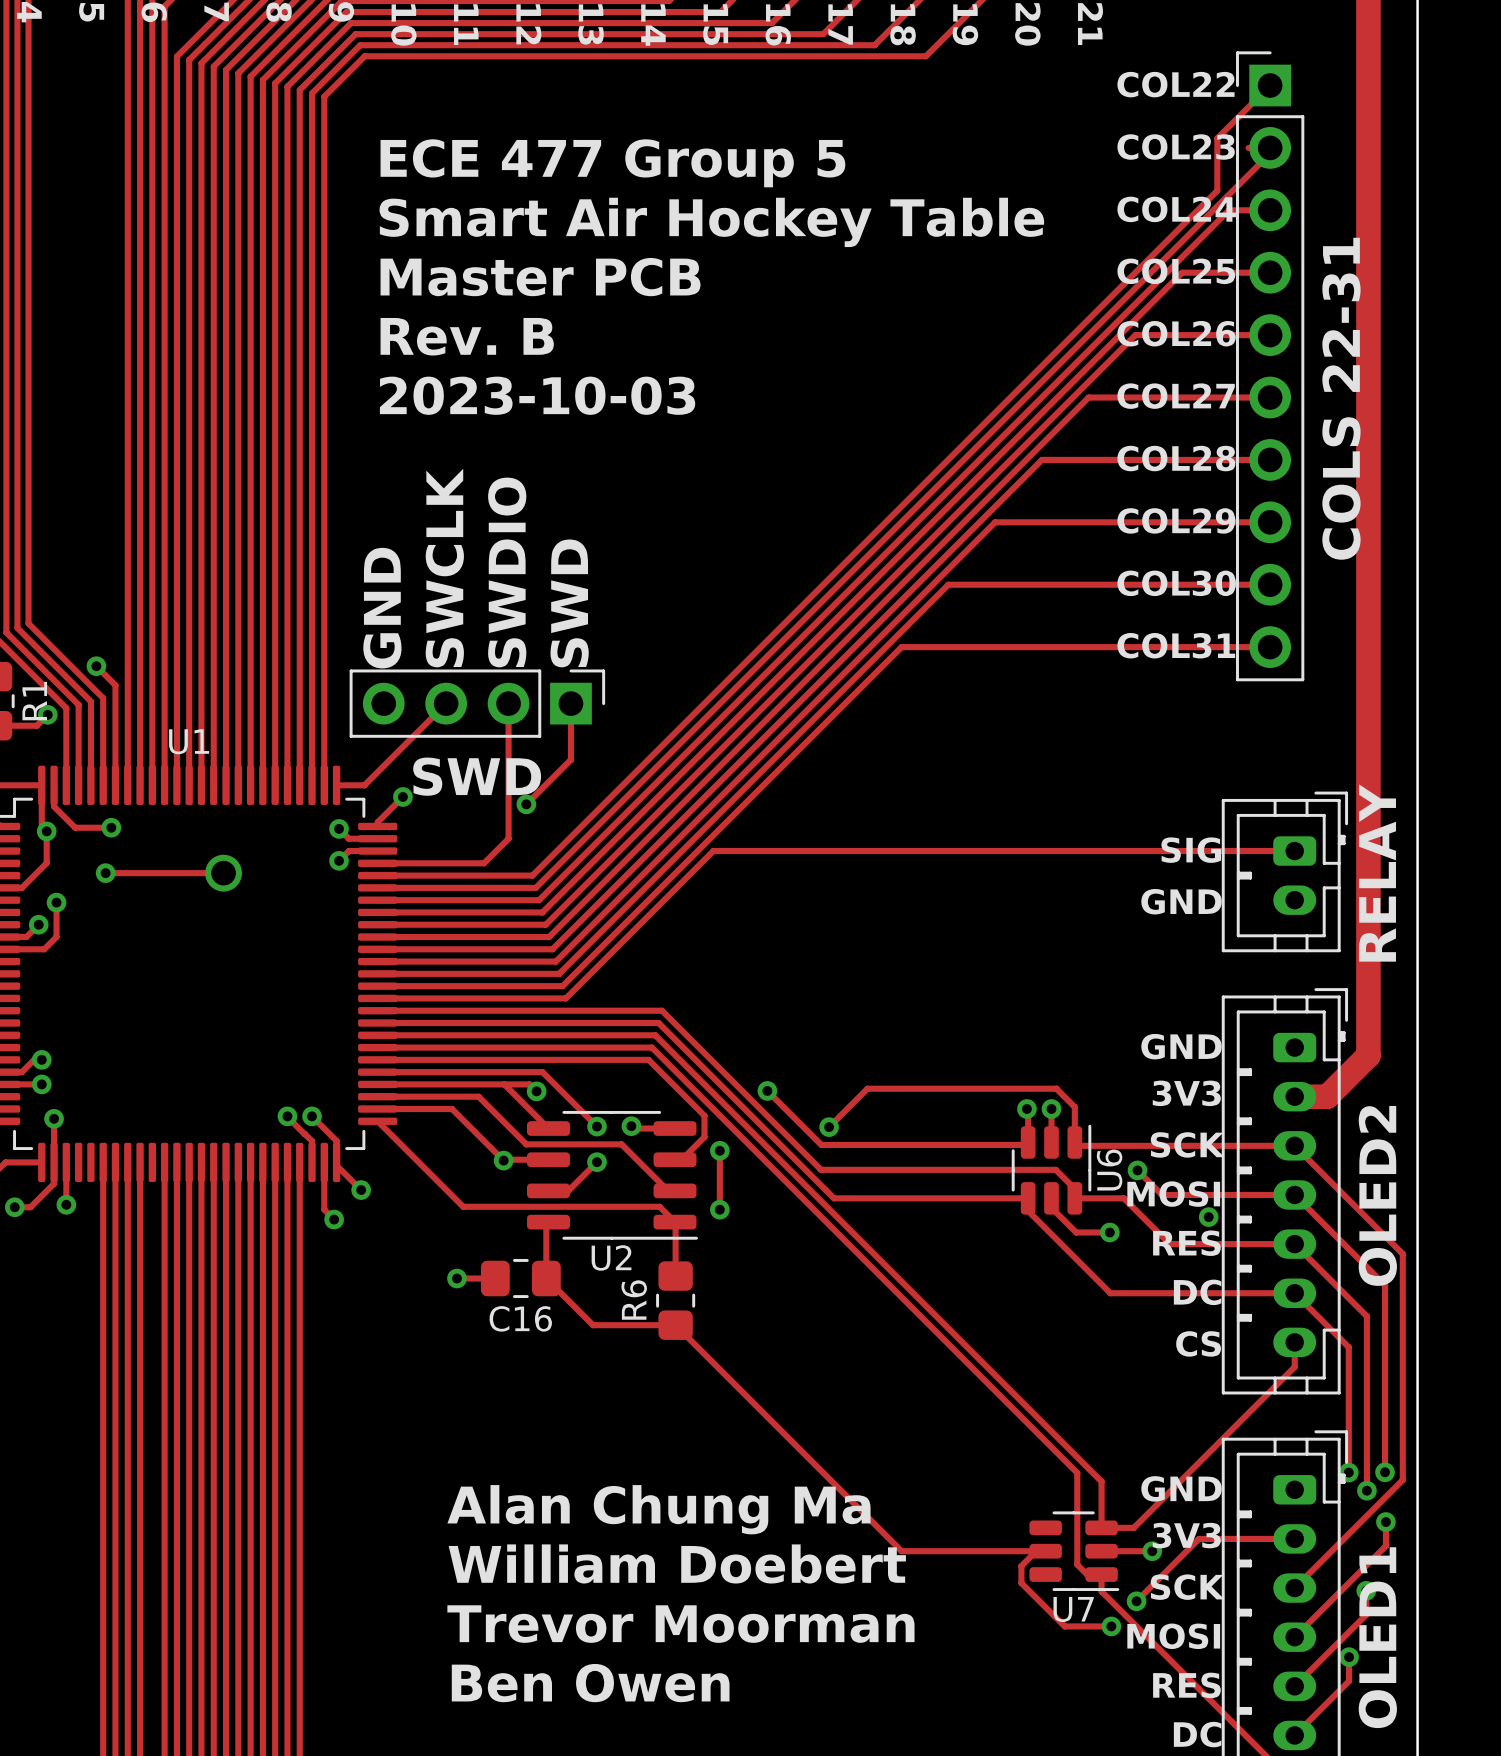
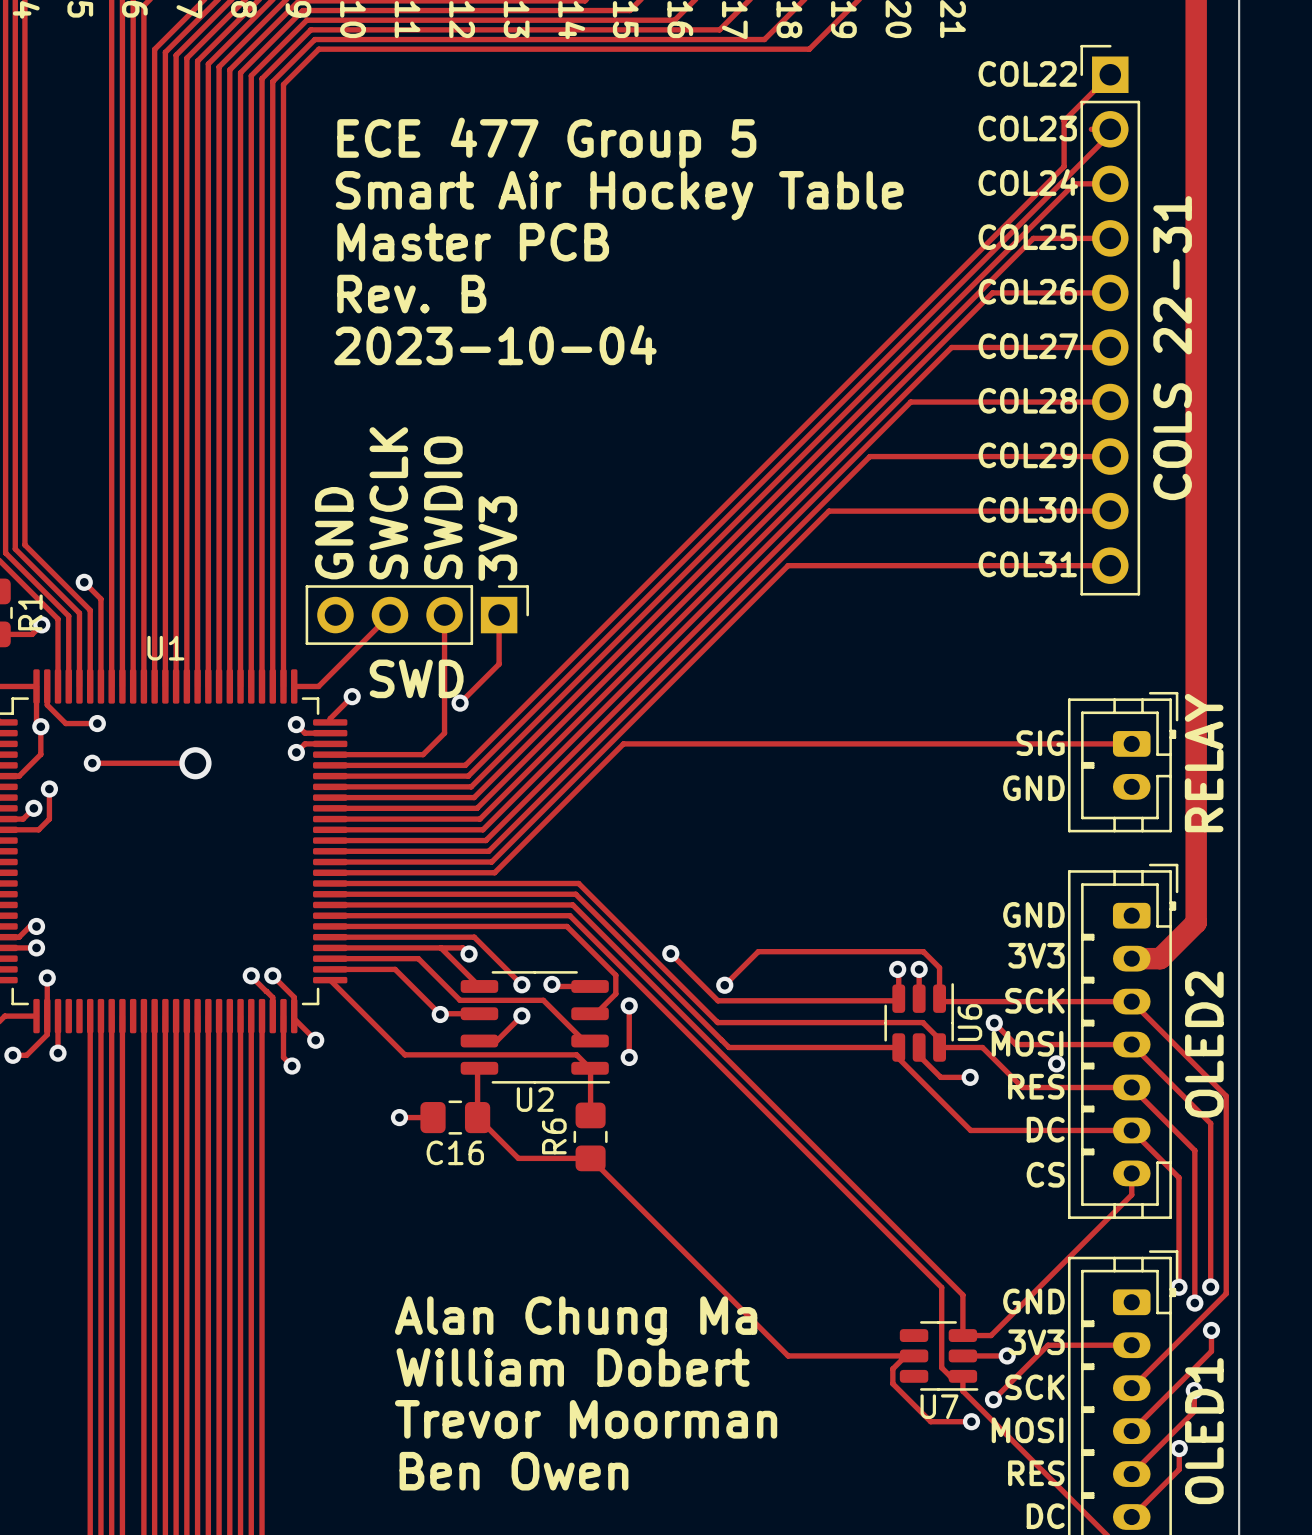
text: 2023-10-03 (537, 395) -> 2023-10-04 (495, 345)
text: SWD (569, 603) -> 3V3 (497, 538)
text: William Doebert (677, 1563) -> William Dobert (573, 1367)

